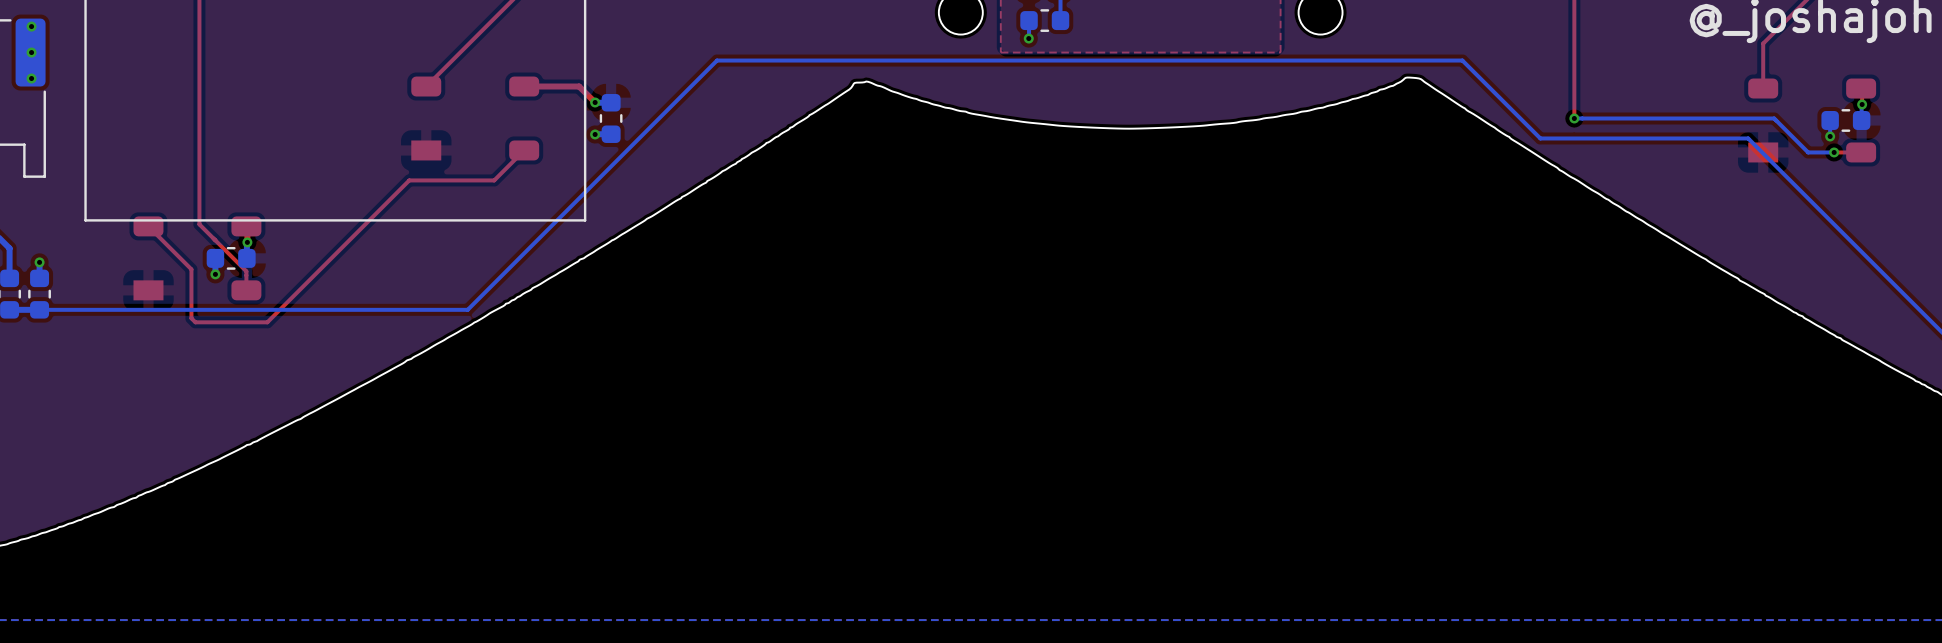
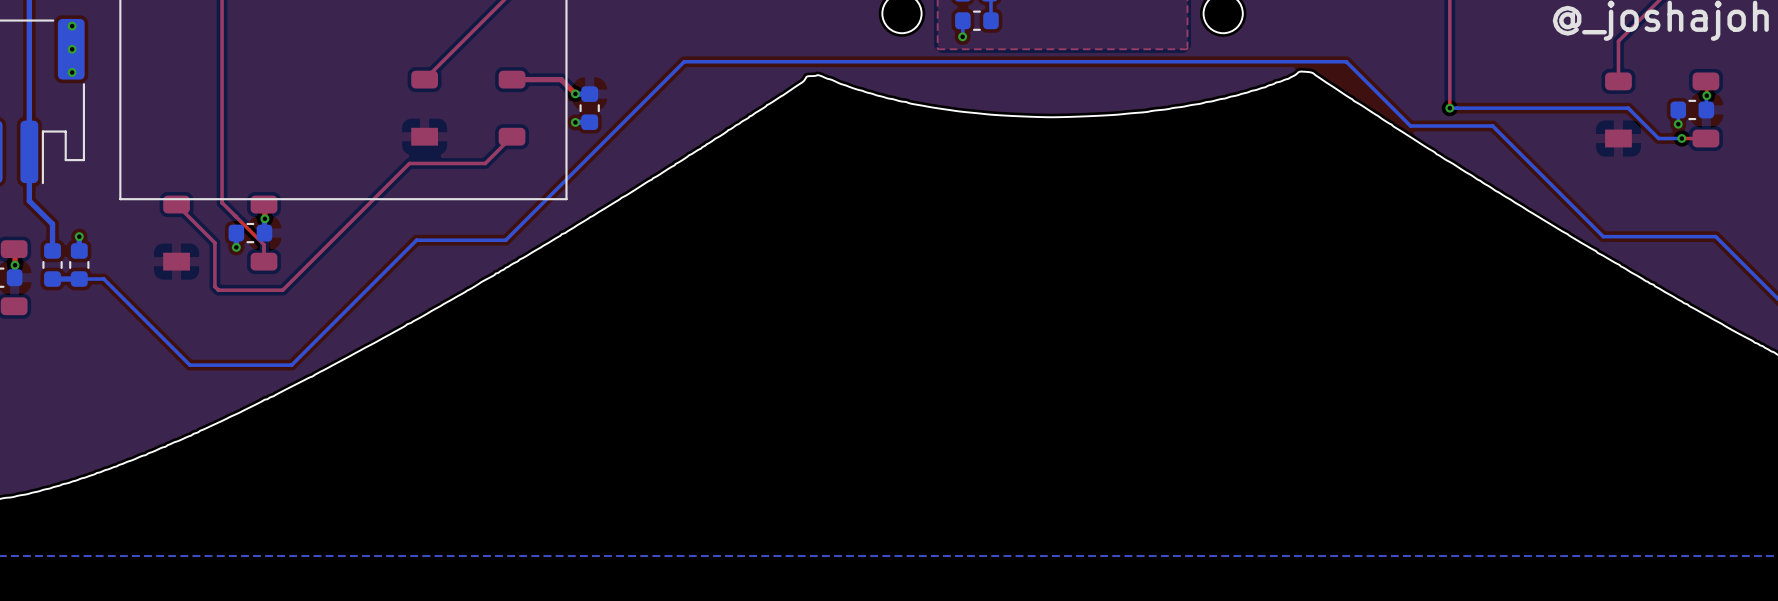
bottom track: (1540, 138) (1462, 60) (717, 60) (467, 309) (67, 309) -> (1419, 126) (1410, 126) (1346, 61) (684, 61) (505, 240) (416, 240) (291, 365) (189, 365) (103, 279)
bottom track: (1622, 138) (1748, 138) (1872, 262) -> (1492, 126) (1603, 236) (1715, 236)

